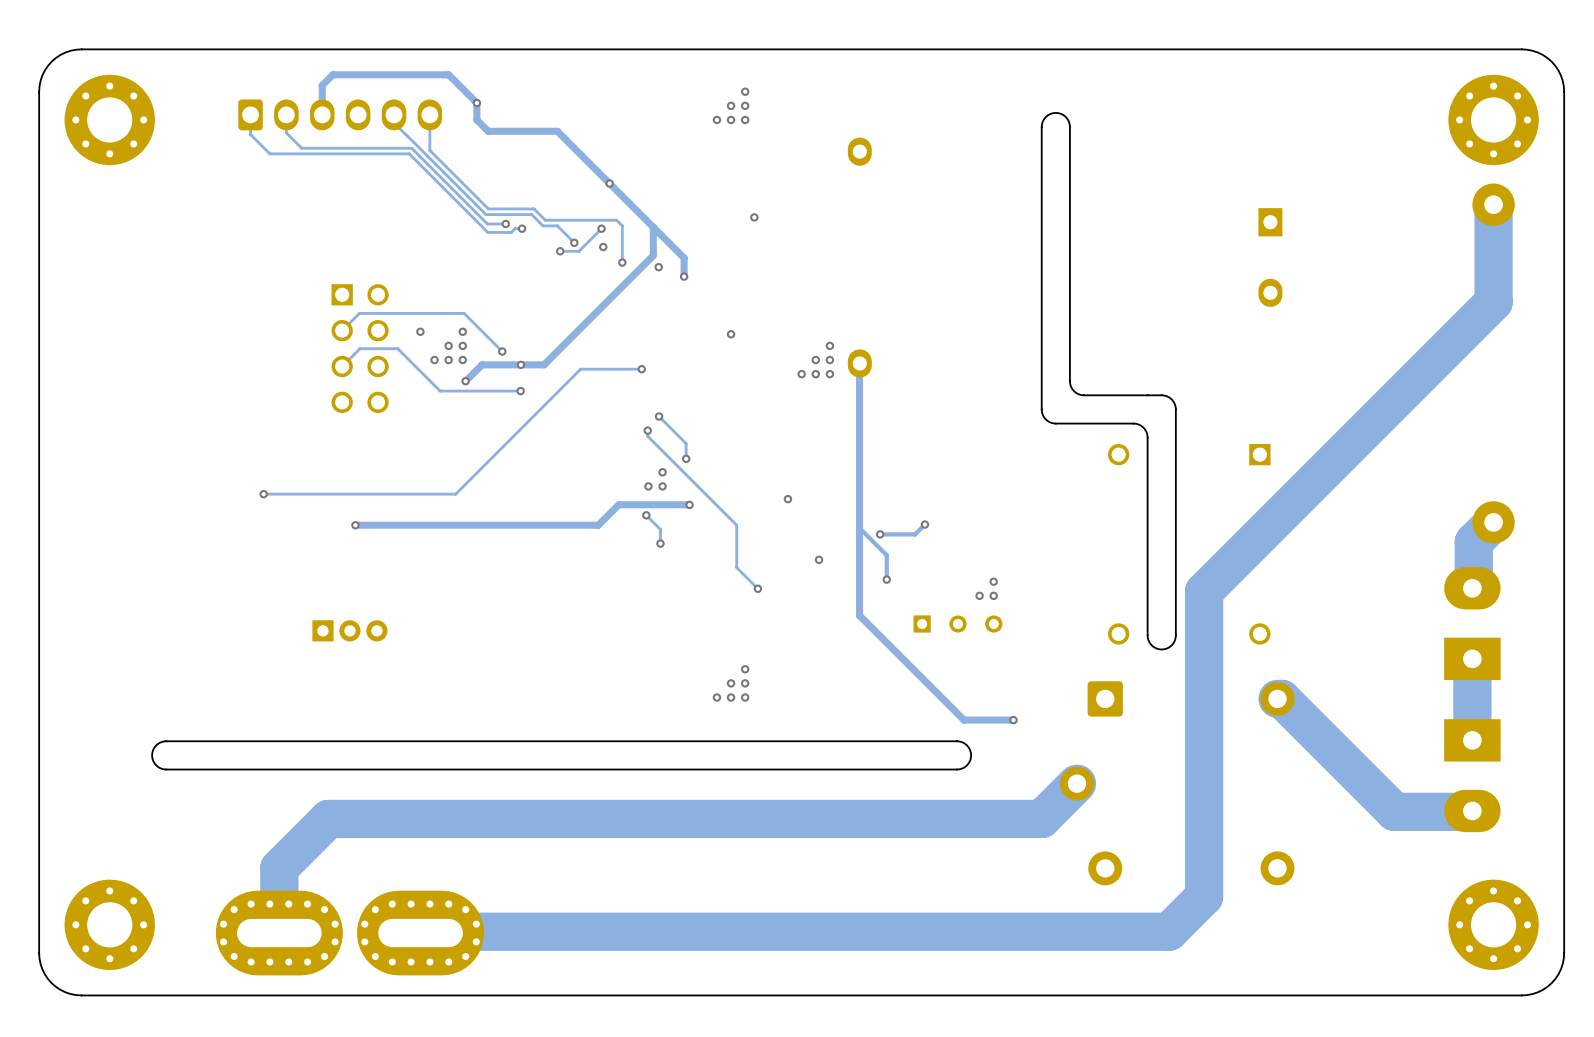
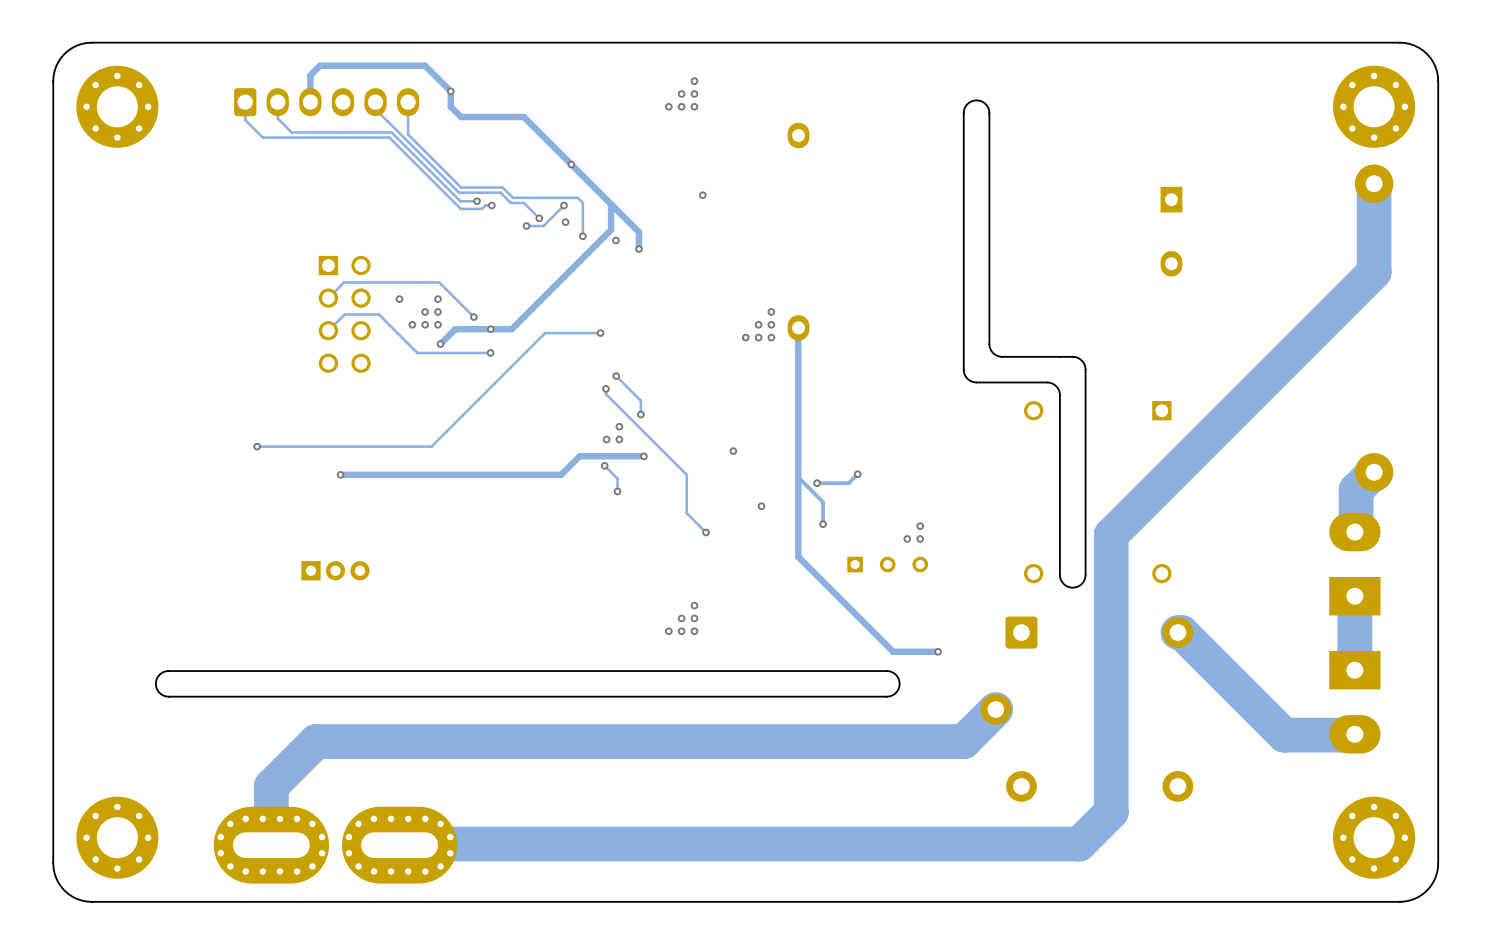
via: (731, 334) -> none

